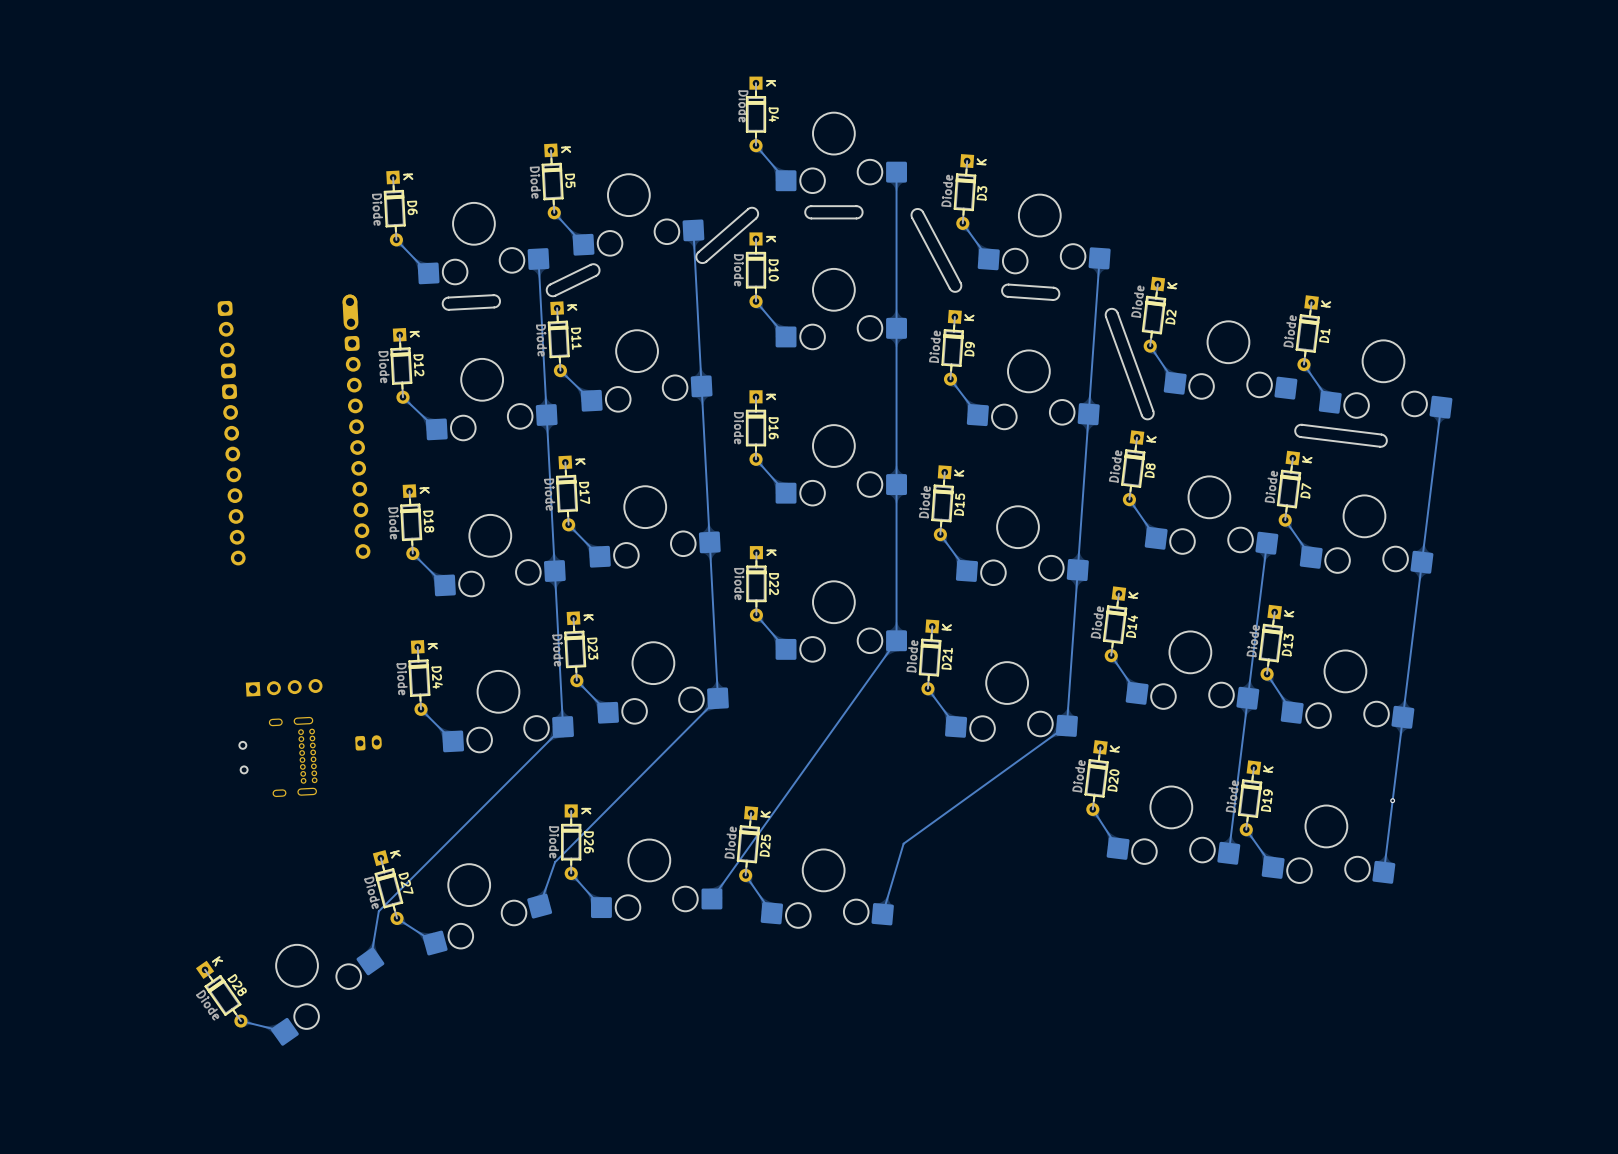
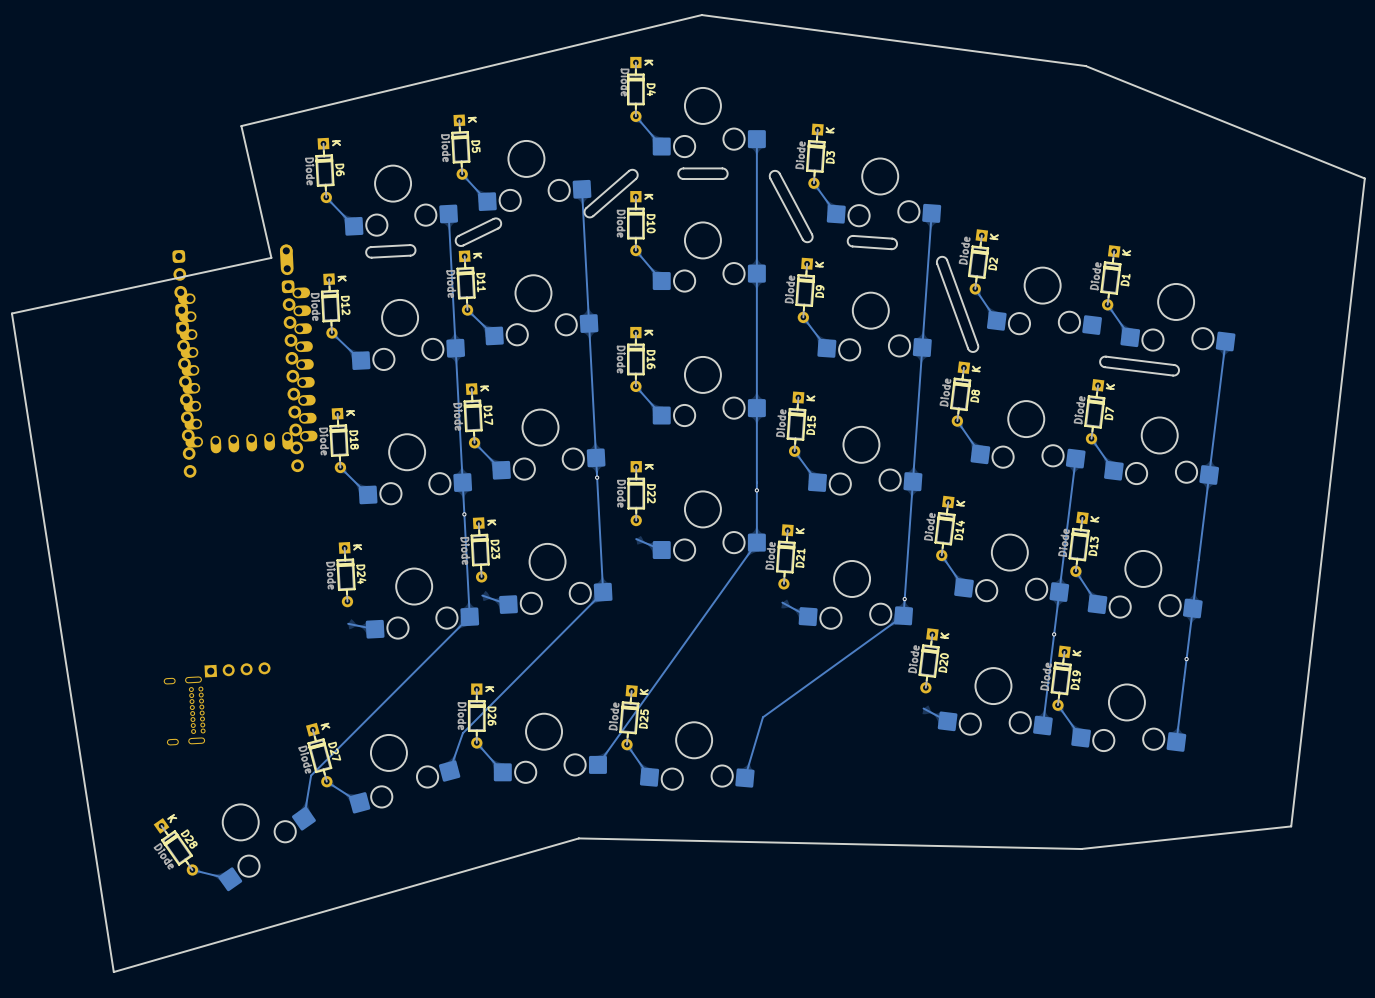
board edge: none -> (701, 15) (241, 126) (271, 257) (11, 313) (113, 972) (578, 838) (1081, 849) (1291, 826) (1364, 178) (1085, 66) (701, 15)
part: none -> (247, 370)
via: none -> (597, 477)
via: none -> (756, 490)
via: none -> (464, 514)
track: (756, 615) (786, 649) -> (636, 539) (661, 550)
track: (576, 680) (608, 712) -> (482, 595) (508, 604)
part position: (284, 687) -> (237, 669)
track: (927, 688) (956, 726) -> (782, 602) (808, 616)
via: none -> (904, 599)
track: (421, 709) (453, 741) -> (348, 623) (375, 629)
part: (368, 742) -> none
via: none -> (1054, 634)
part position: (293, 756) -> (184, 710)
part: (243, 757) -> none
via position: (1392, 800) -> (1186, 659)
track: (1092, 809) (1118, 848) -> (923, 708) (947, 721)

